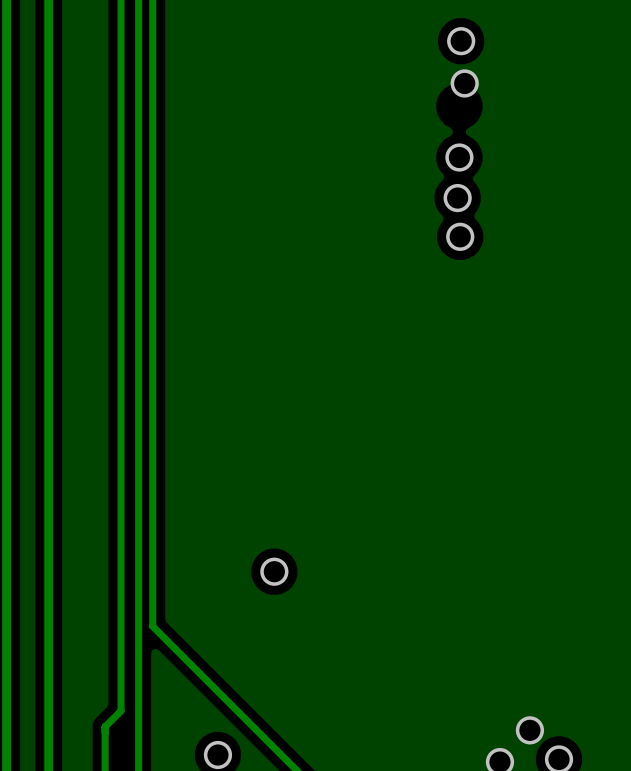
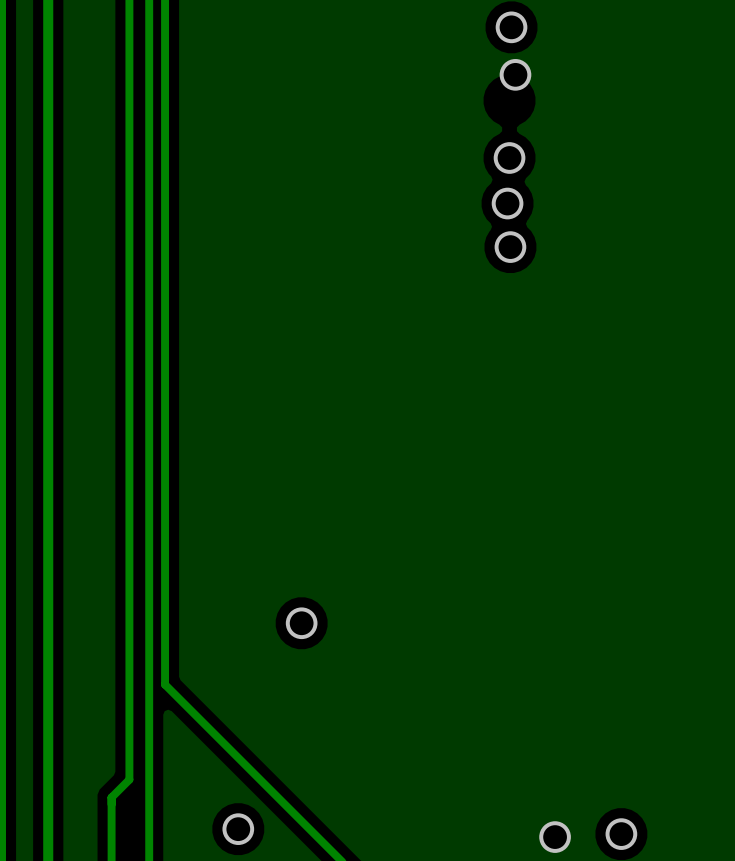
via: (529, 730) -> none

